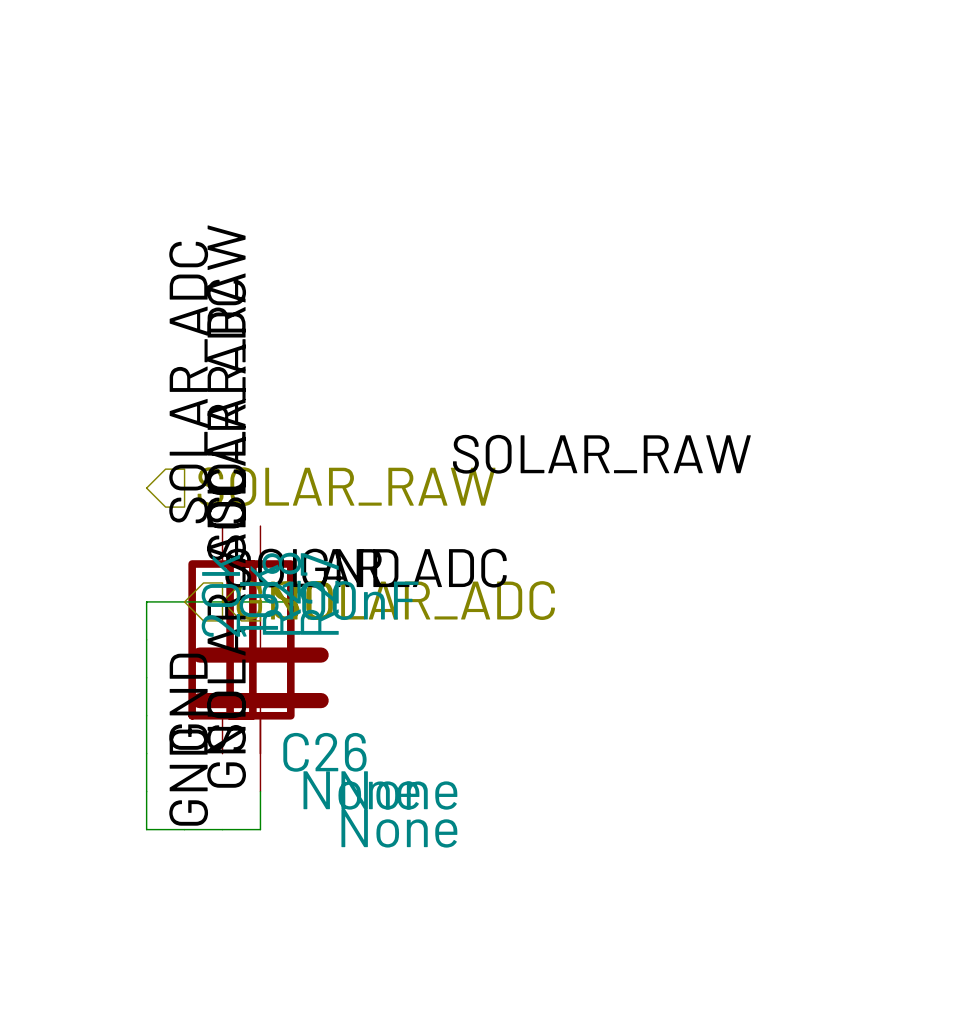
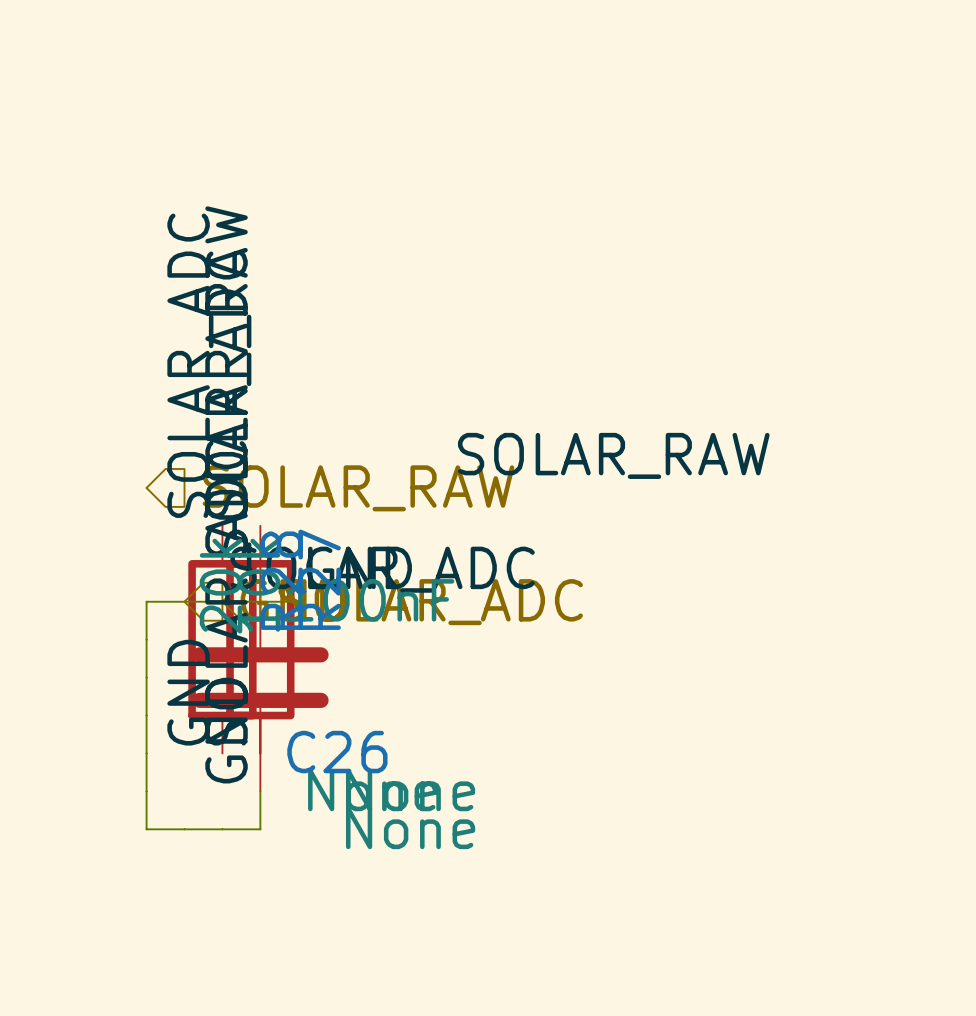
label: GND (188, 777) -> none

